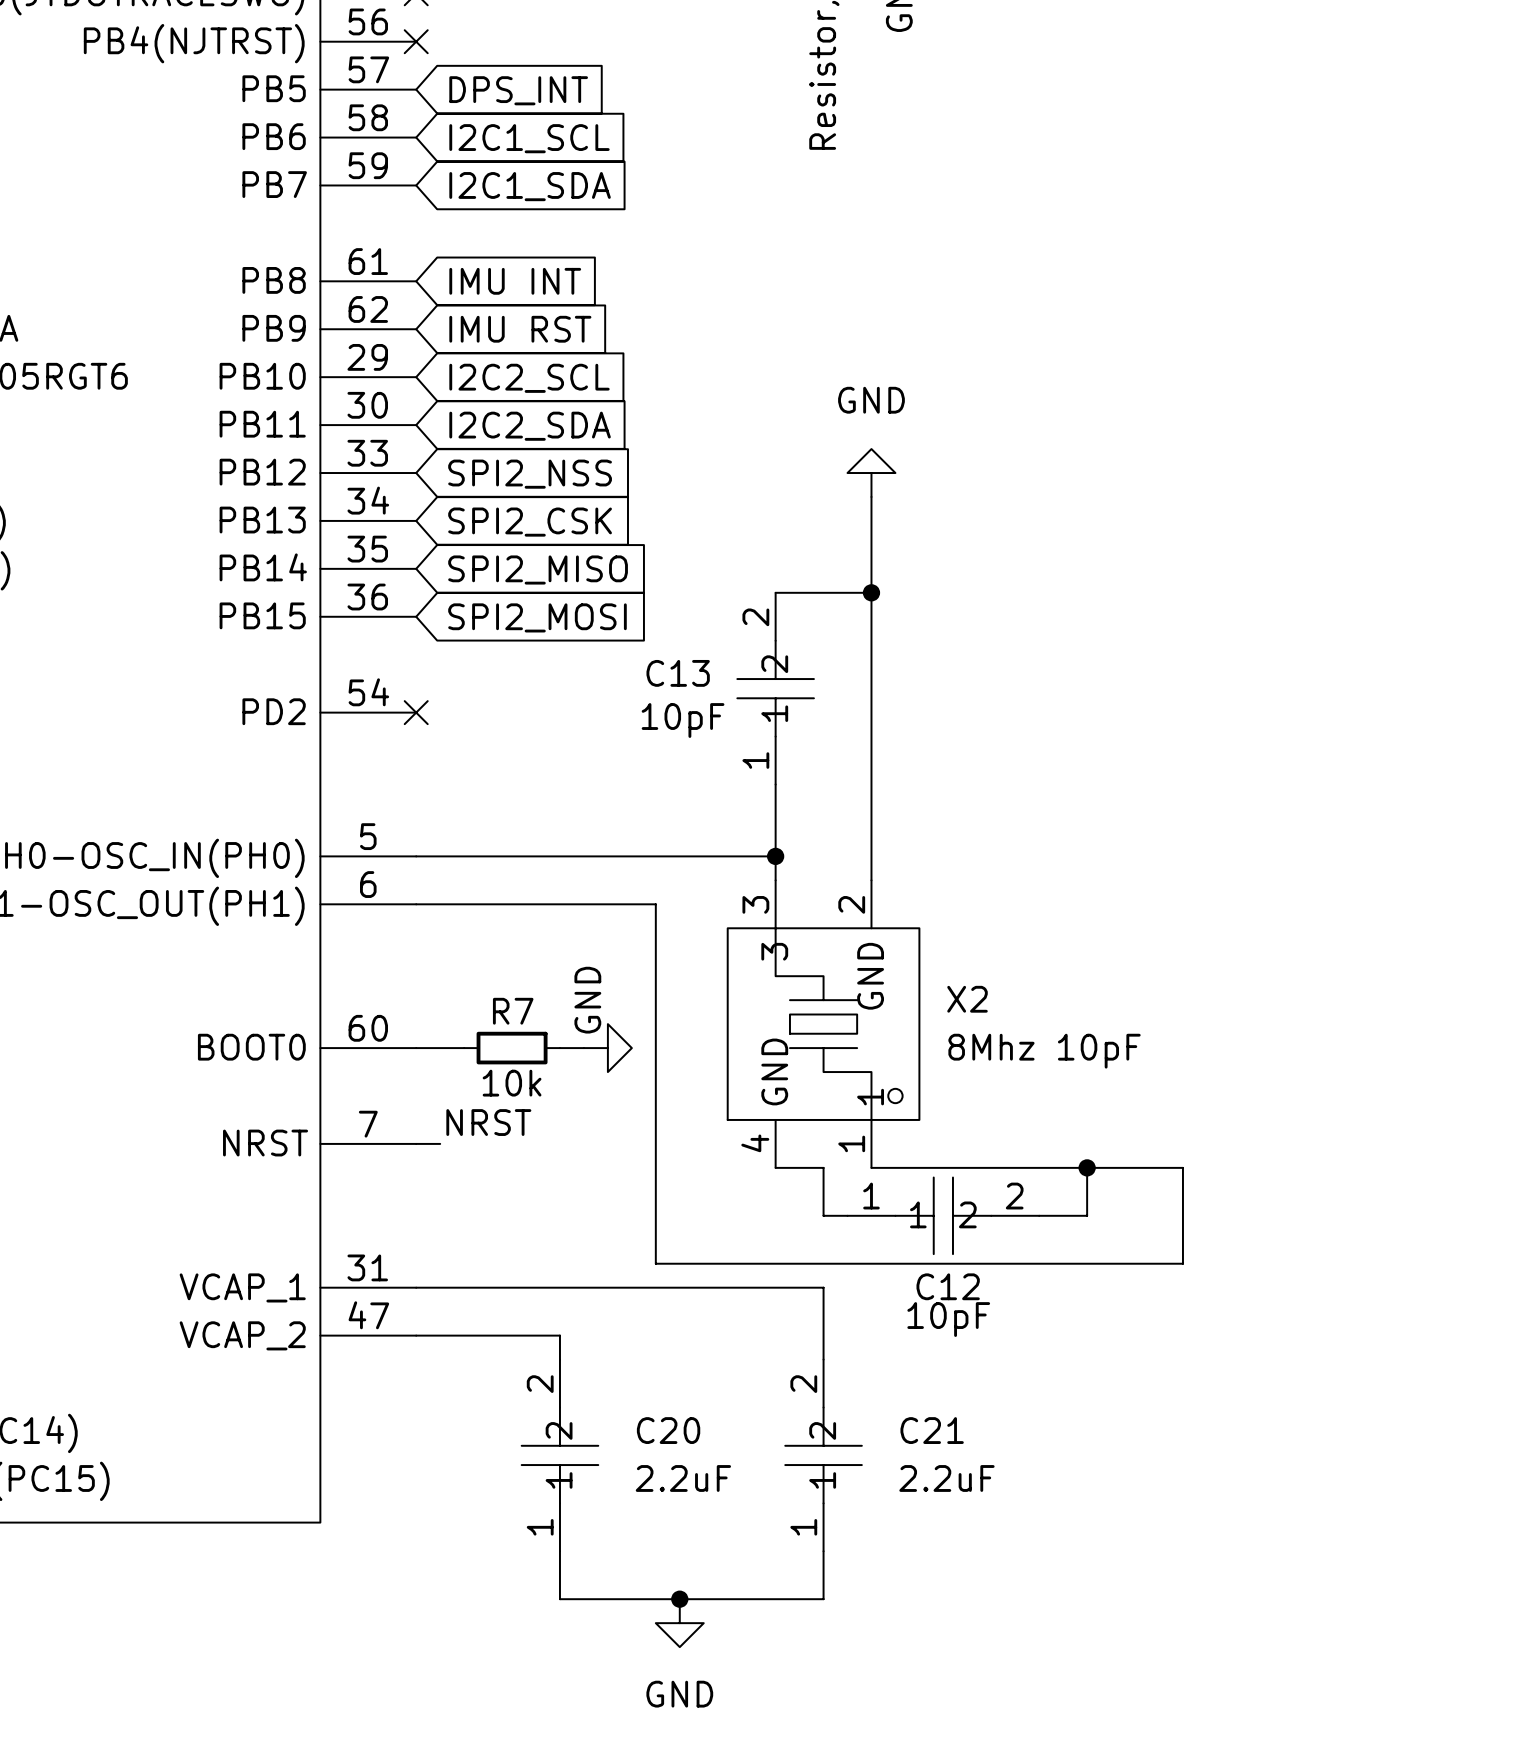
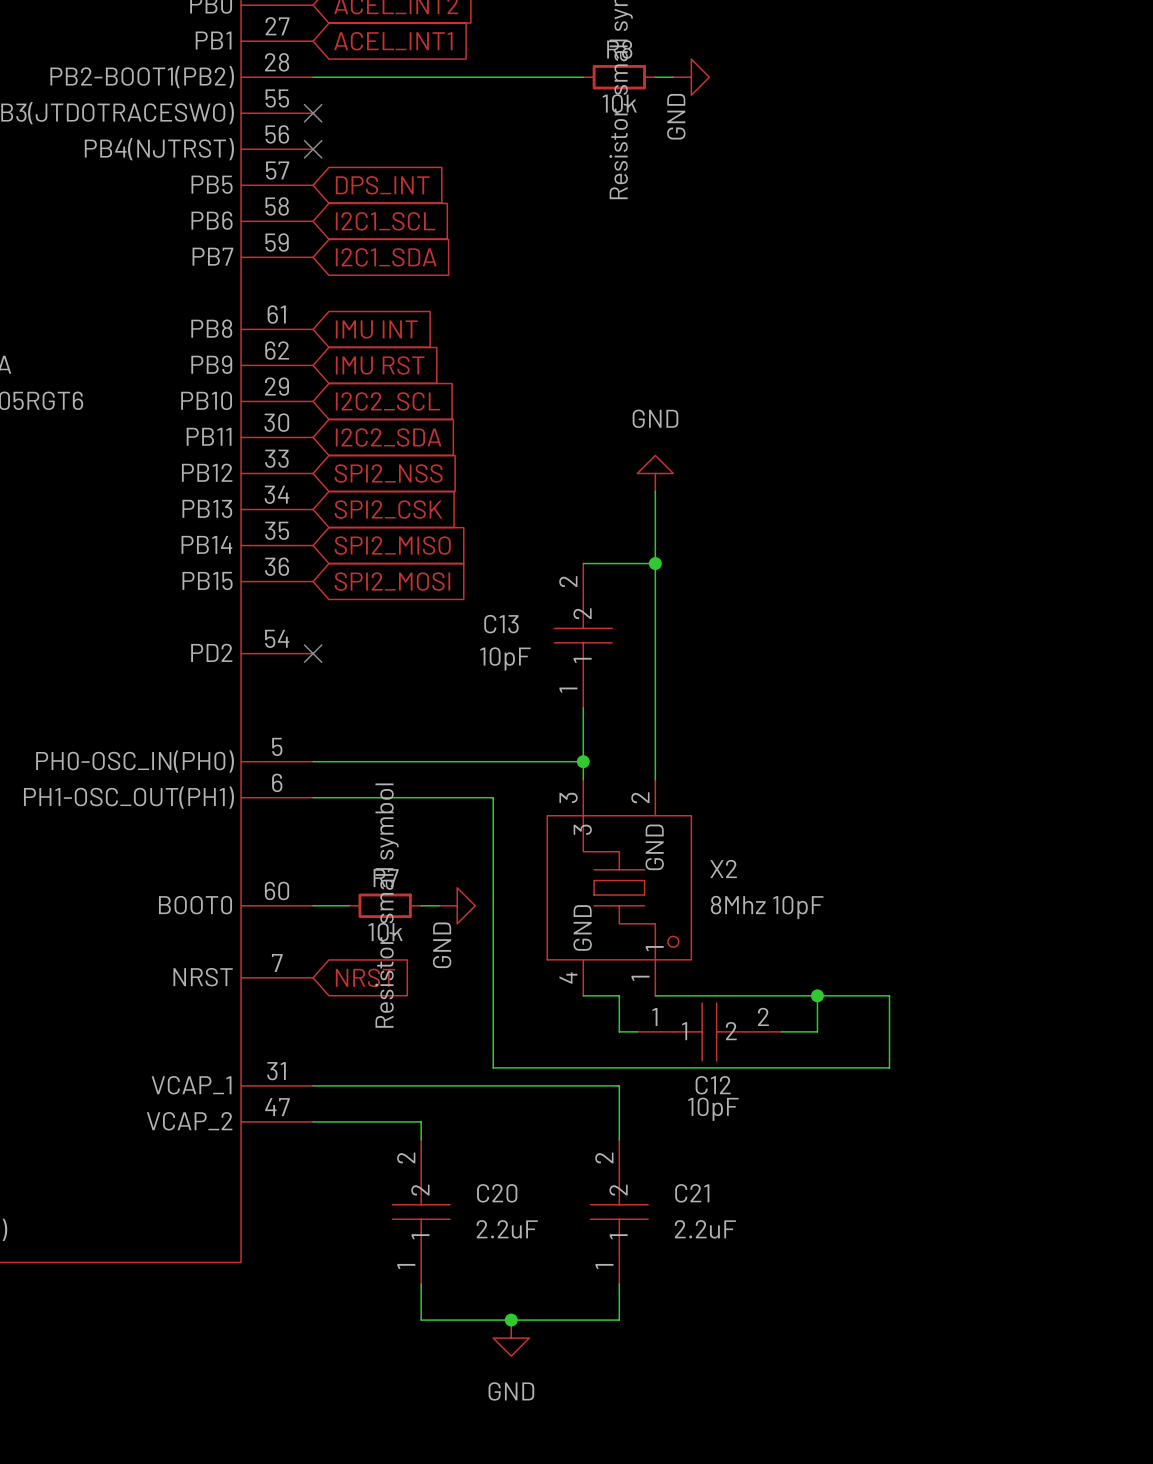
power symbol text position: GND (587, 1000) -> GND (442, 945)
R7 text: none -> Resistor, small symbol (386, 905)
label: NRST (488, 1122) -> none
wire: (416, 1143) (440, 1143) -> none
global label: none -> NRST (365, 977)

